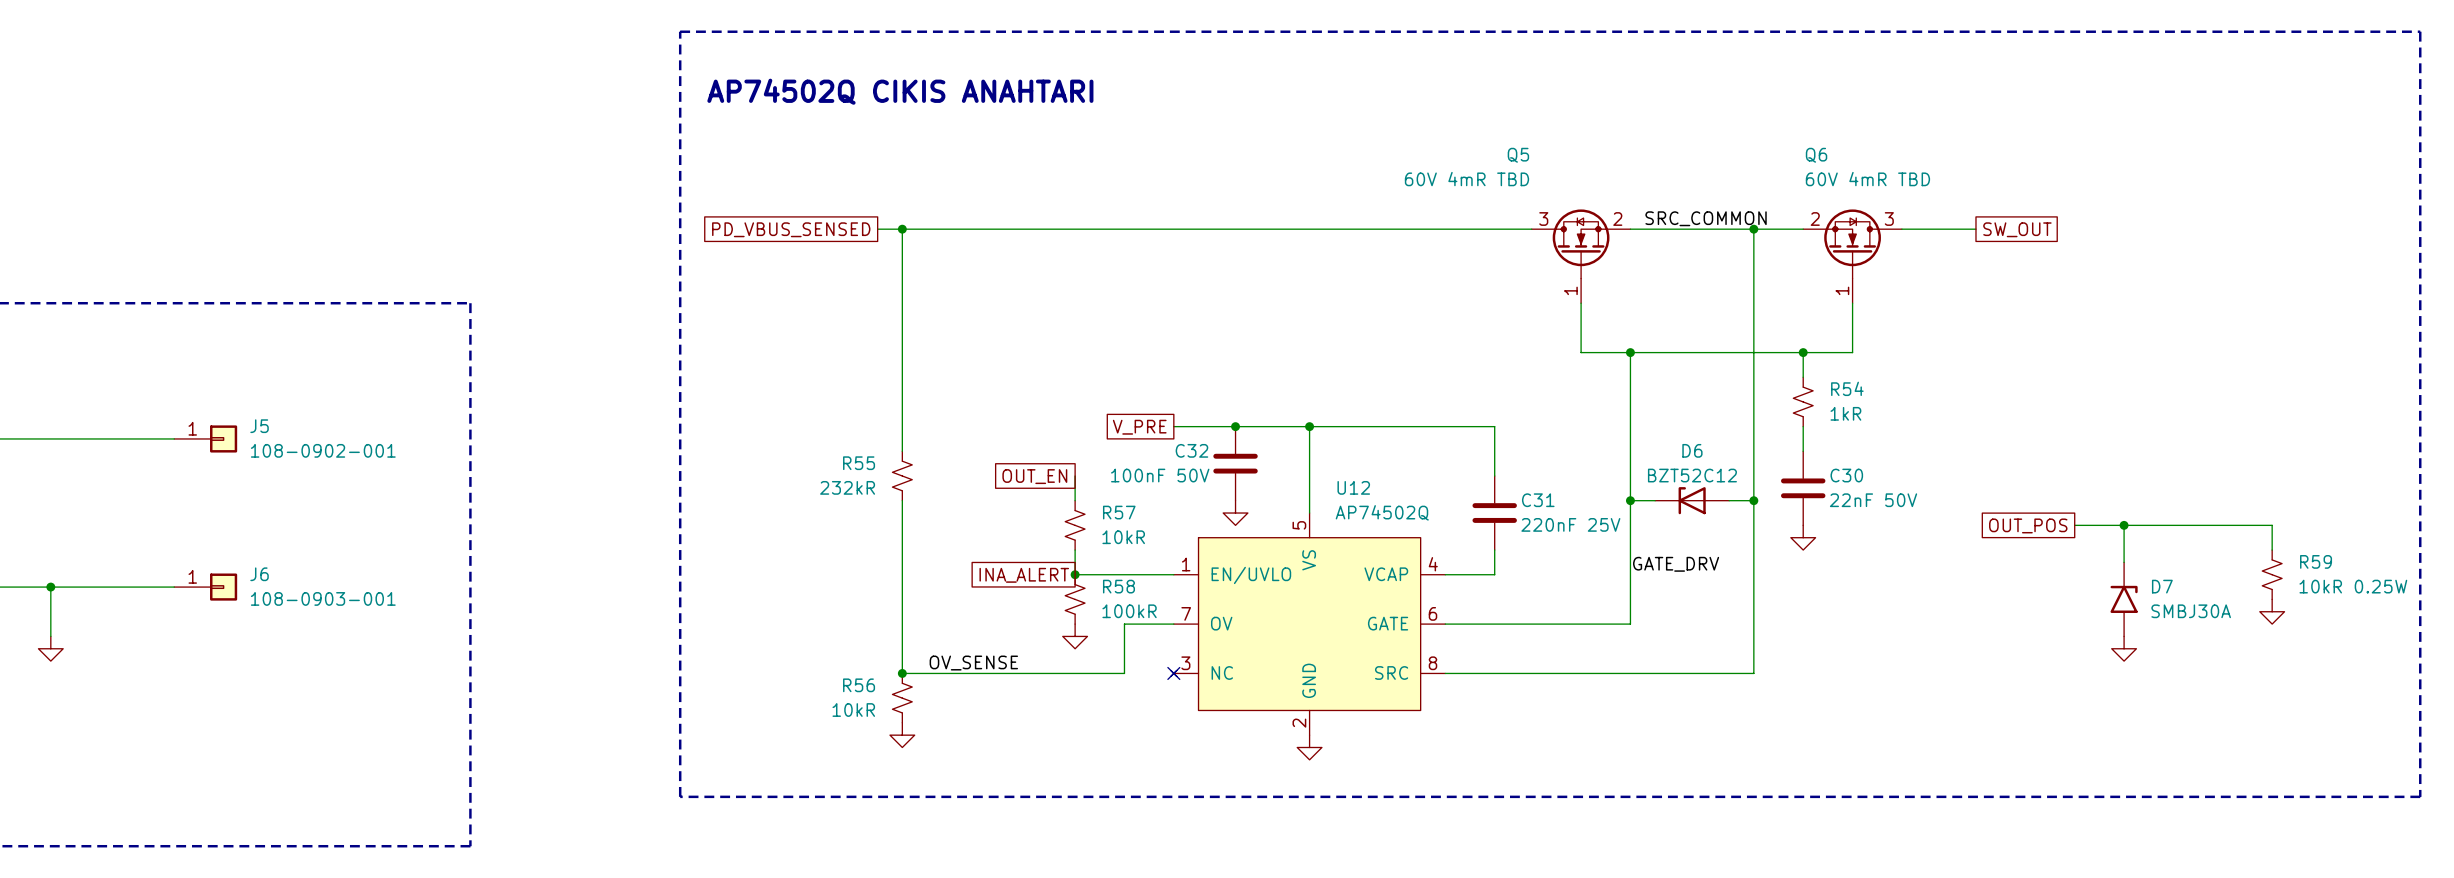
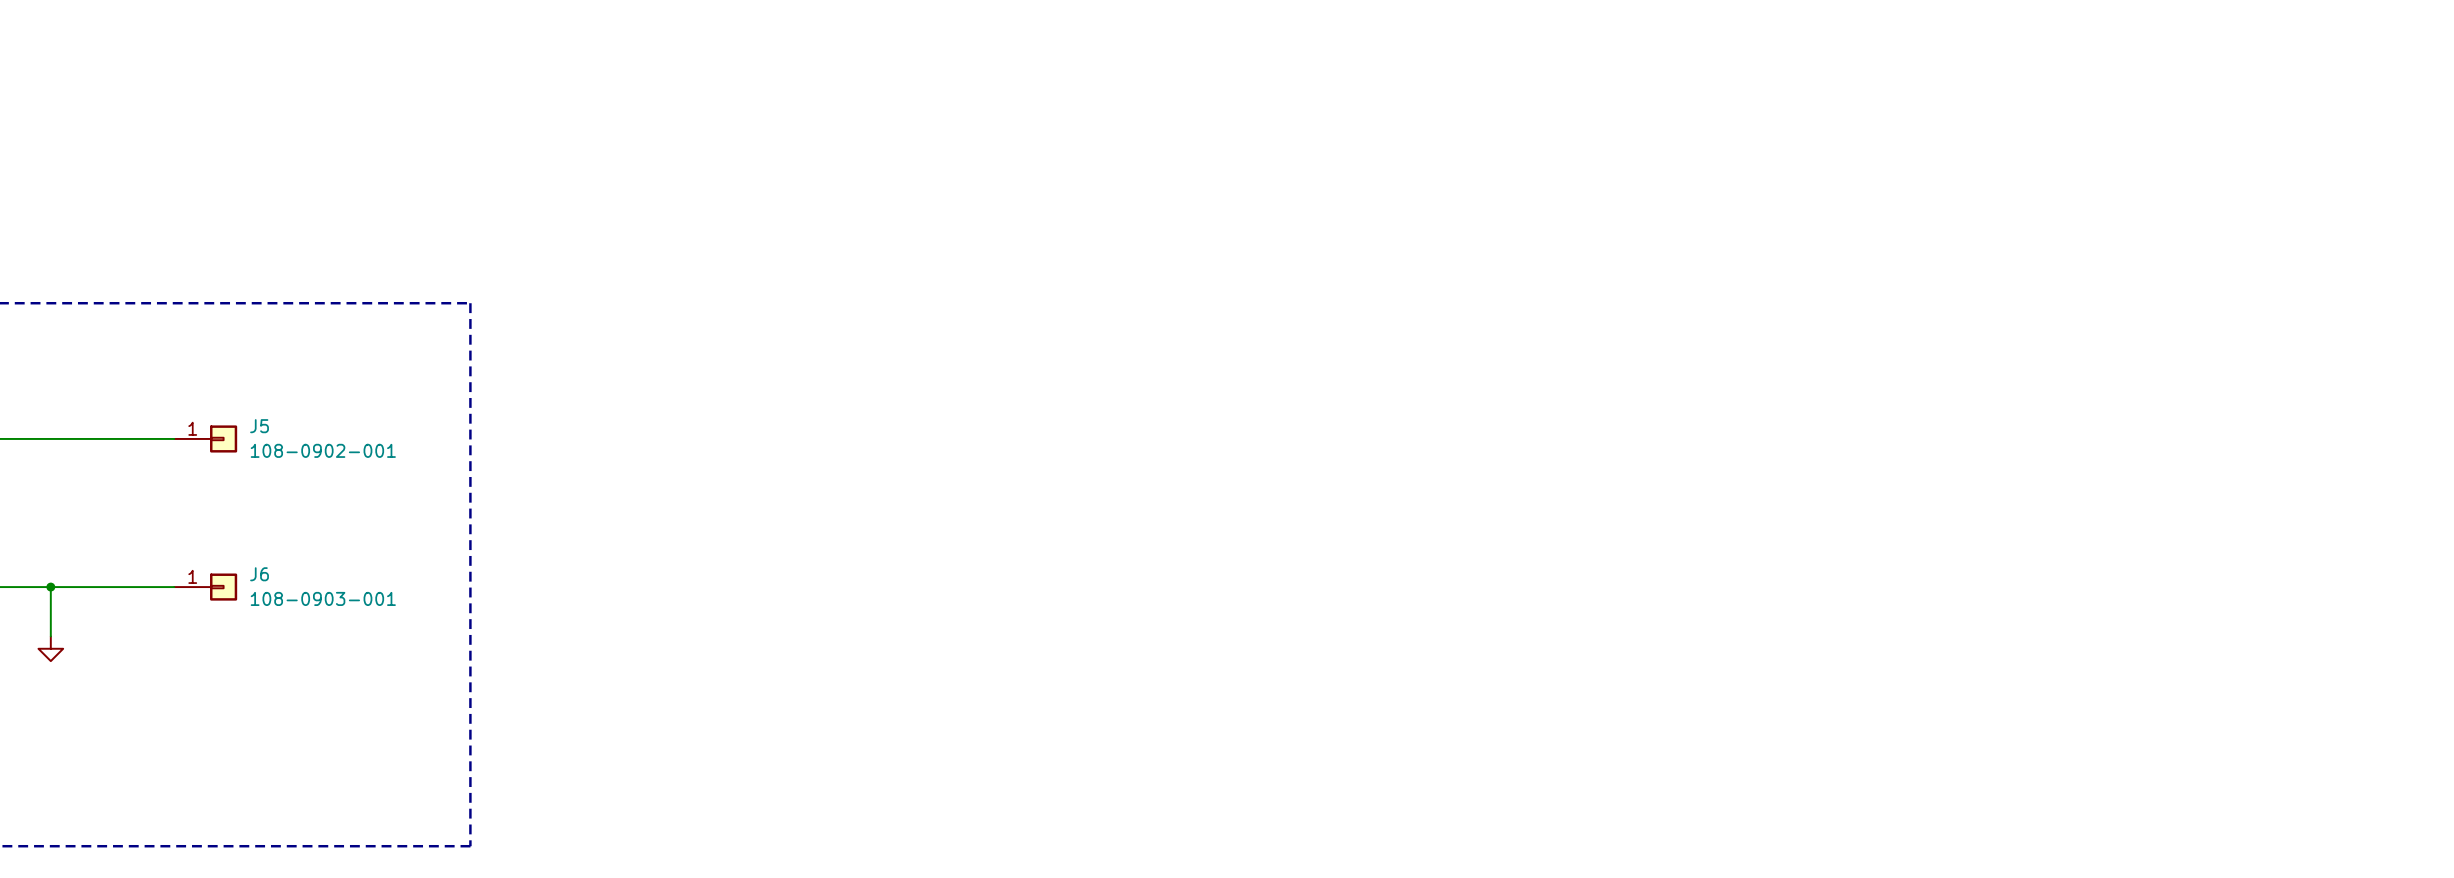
line: (680, 31) (2420, 31) (2420, 796) (680, 796) (680, 31) -> none
text: AP74502Q CIKIS ANAHTARI (900, 91) -> none
label: SRC_COMMON (1706, 218) -> none
global label: PD_VBUS_SENSED (791, 229) -> none
wire: (877, 229) (1531, 229) -> none
wire: (902, 229) (902, 451) -> none
junction: (902, 229) -> none
wire: (1630, 229) (1803, 229) -> none
wire: (1753, 229) (1753, 673) (1445, 673) -> none
junction: (1753, 229) -> none
wire: (1901, 229) (1975, 229) -> none
global label: SW_OUT (2017, 229) -> none
Q5: 60V 4mR TBD (1581, 256) -> none
Q6: 60V 4mR TBD (1852, 256) -> none
wire: (1581, 303) (1581, 352) (1852, 352) (1852, 303) -> none
wire: (1630, 352) (1630, 624) (1445, 624) -> none
junction: (1630, 352) -> none
wire: (1803, 352) (1803, 377) -> none
junction: (1803, 352) -> none
R54: 1kR (1803, 401) -> none
wire: (1173, 426) (1494, 426) (1494, 476) -> none
junction: (1235, 426) -> none
wire: (1309, 426) (1309, 513) -> none
junction: (1309, 426) -> none
wire: (1803, 426) (1803, 451) -> none
global label: V_PRE (1139, 427) -> none
C32: 100nF 50V (1235, 463) -> none
R55: 232kR (902, 476) -> none
global label: OUT_EN (1034, 476) -> none
wire: (1075, 476) (1075, 500) -> none
C30: 22nF 50V (1803, 488) -> none
wire: (902, 500) (902, 673) (1124, 673) (1124, 624) (1173, 624) -> none
wire: (1630, 500) (1655, 500) -> none
junction: (1630, 500) -> none
D6: BZT52C12 (1692, 500) -> none
wire: (1729, 500) (1753, 500) -> none
junction: (1753, 500) -> none
power symbol: (1235, 513) -> none
C31: 220nF 25V (1494, 513) -> none
R57: 10kR (1075, 525) -> none
global label: OUT_POS (2028, 525) -> none
wire: (2074, 525) (2272, 525) (2272, 550) -> none
wire: (2124, 525) (2124, 562) -> none
junction: (2124, 525) -> none
power symbol: (1803, 537) -> none
wire: (1075, 550) (1075, 574) (1173, 574) -> none
wire: (1494, 550) (1494, 574) (1445, 574) -> none
label: GATE_DRV (1676, 564) -> none
junction: (1075, 574) -> none
R59: 10kR 0.25W (2272, 574) -> none
global label: INA_ALERT (1024, 575) -> none
R58: 100kR (1075, 599) -> none
D7: SMBJ30A (2124, 599) -> none
power symbol: (2272, 611) -> none
U12: AP74502Q (1308, 624) -> none
power symbol: (1075, 636) -> none
power symbol: (2124, 648) -> none
label: OV_SENSE (973, 663) -> none
junction: (902, 673) -> none
no-connect mark: (1173, 673) -> none
R56: 10kR (902, 698) -> none
power symbol: (902, 735) -> none
power symbol: (1309, 747) -> none

